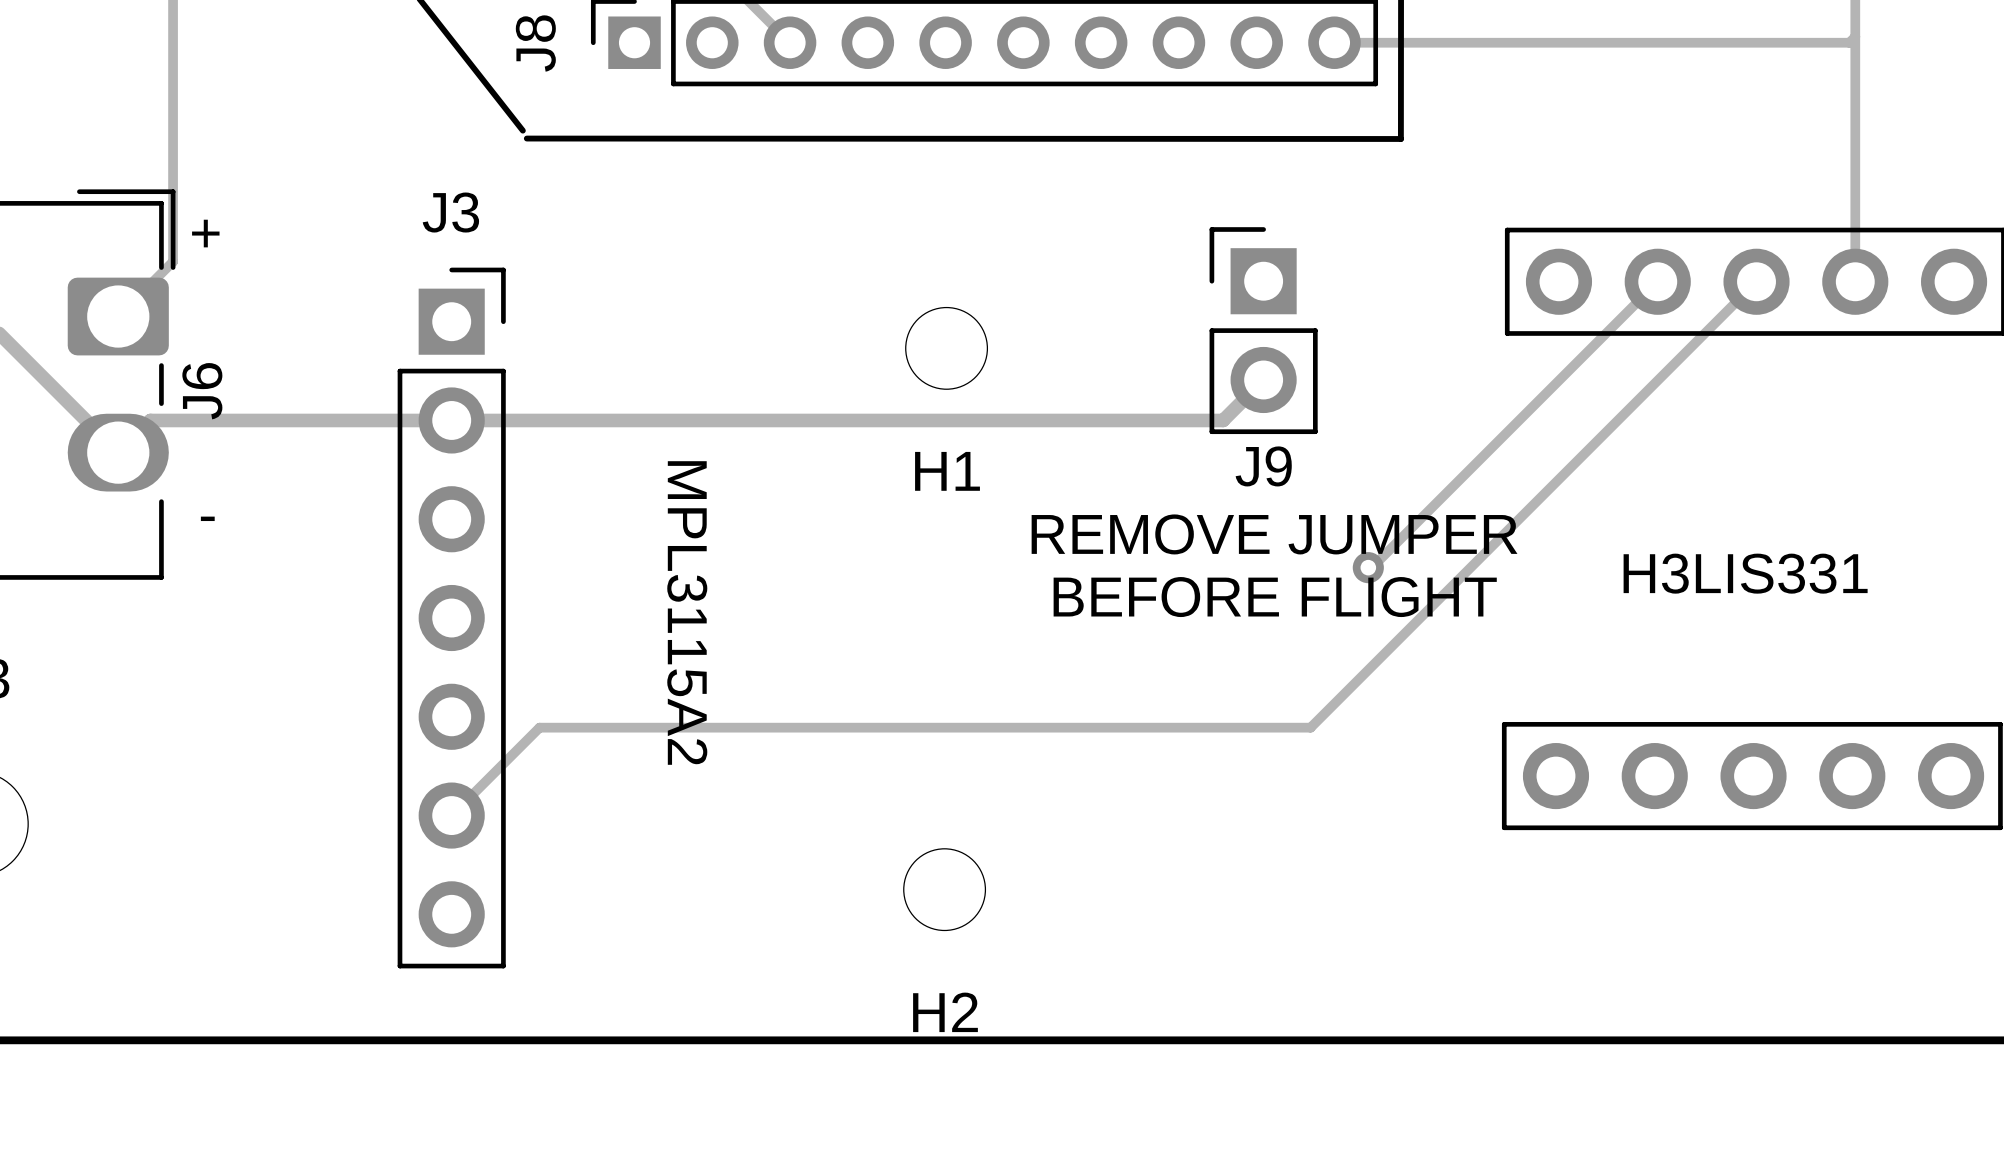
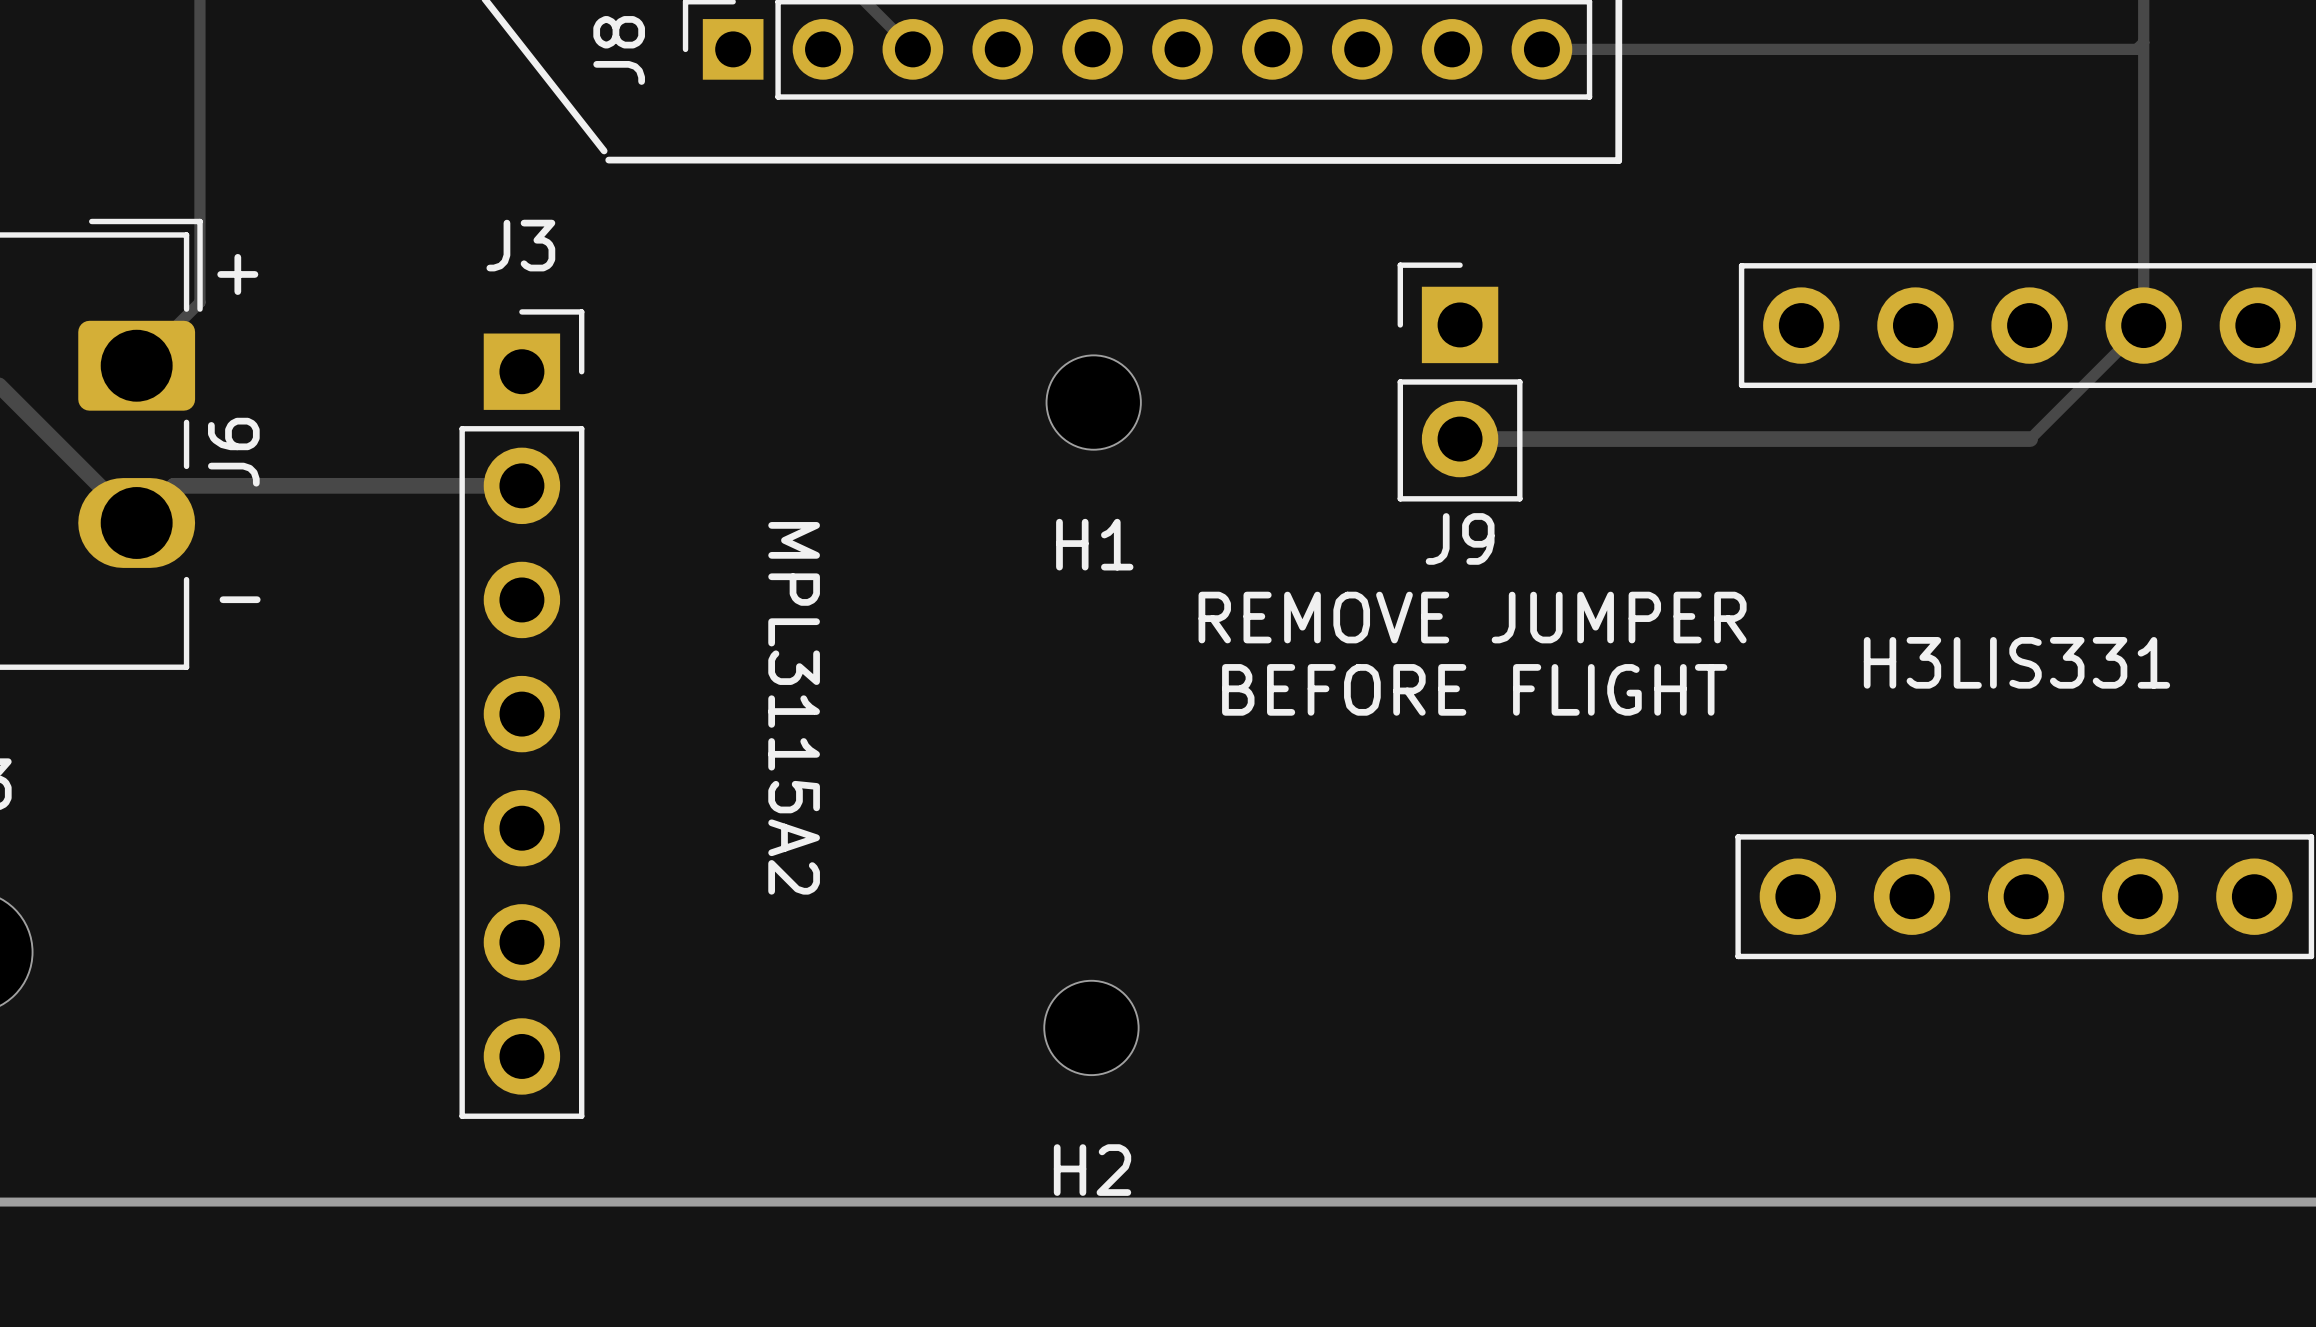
track: (1657, 281) (1371, 567) (1368, 567) -> none
track: (1756, 281) (1310, 727) (539, 727) (451, 815) -> none
track: none -> (2143, 325) (2034, 434)
track: (1263, 379) (1223, 420) (451, 420) -> (1460, 439) (2030, 439)
via: (1368, 567) -> none

